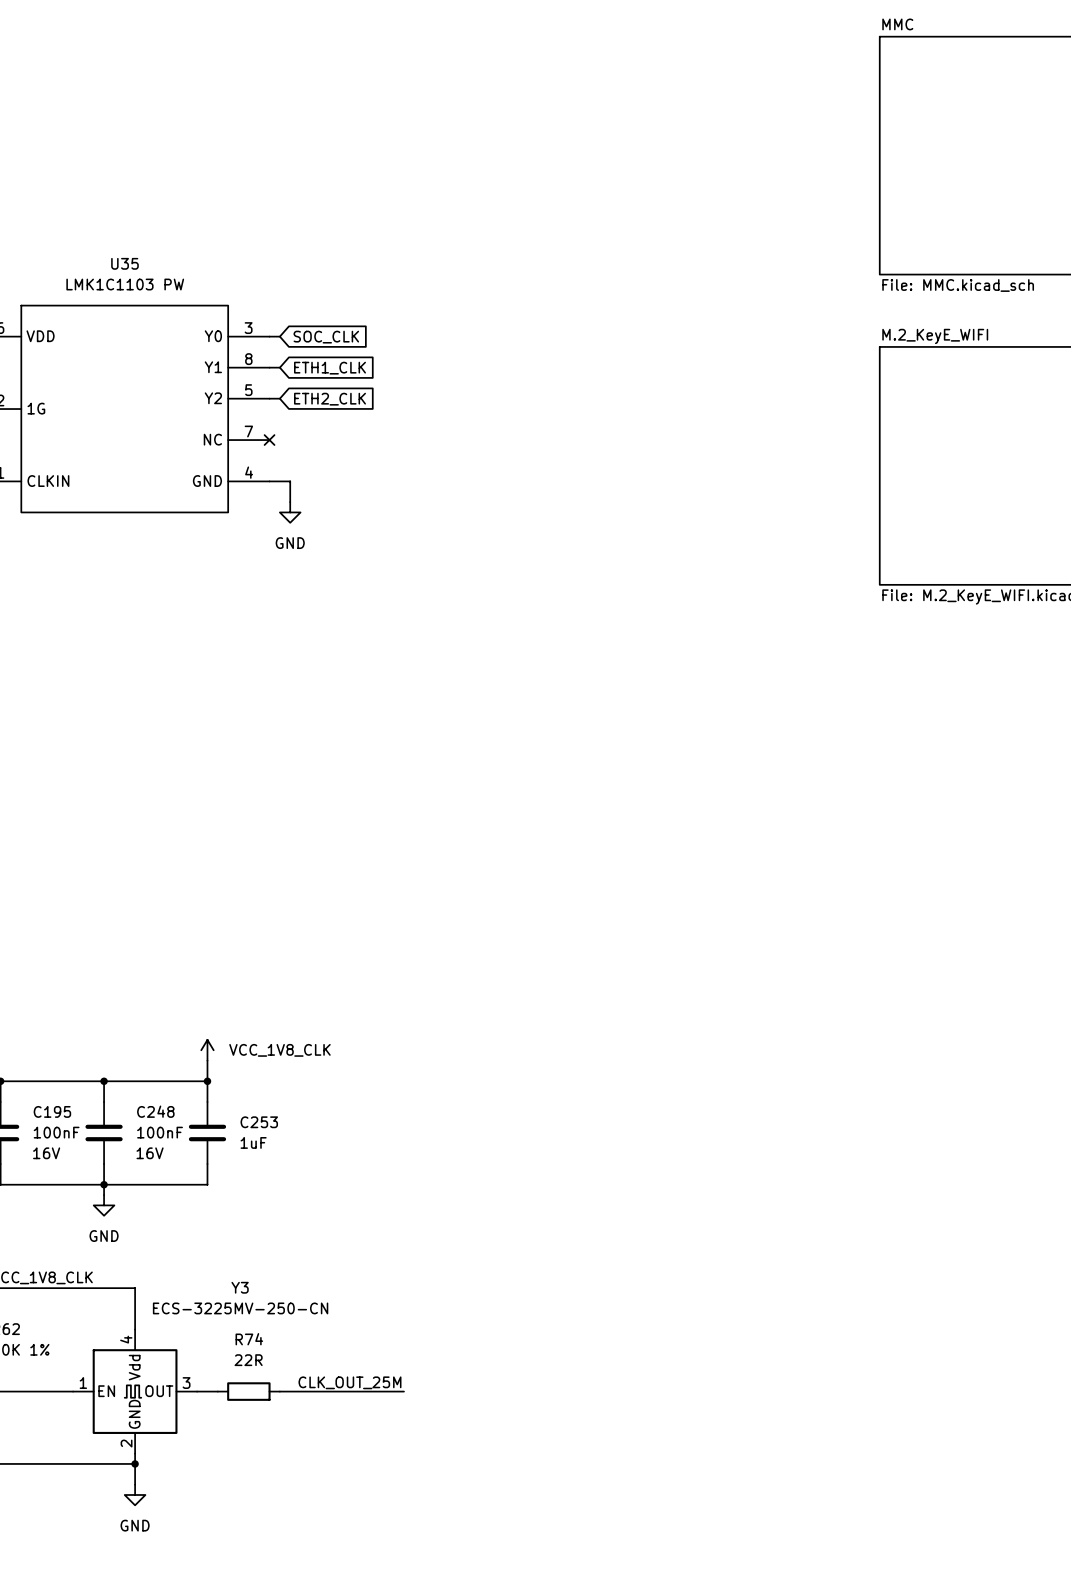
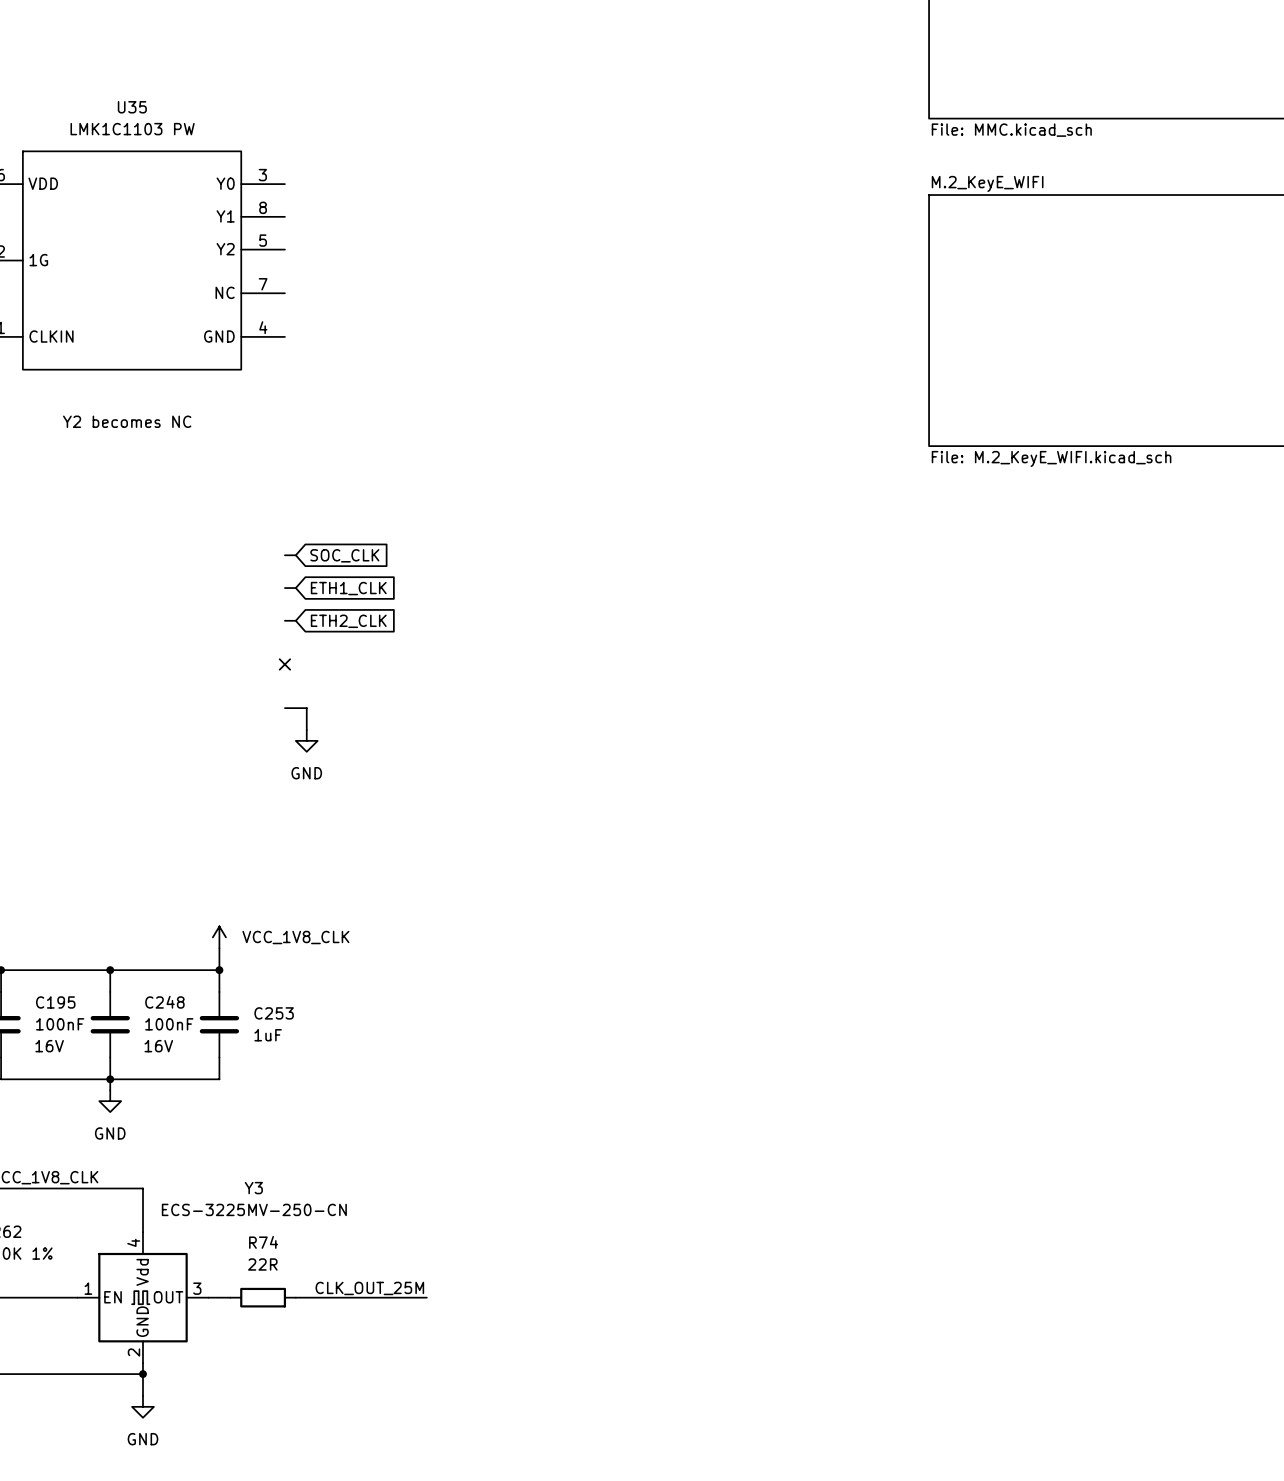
wire: (269, 336) (279, 336) -> none
global label: SOC_CLK (326, 337) -> none
wire: (269, 367) (279, 367) -> none
global label: ETH1_CLK (330, 368) -> none
wire: (269, 398) (279, 398) -> none
global label: ETH2_CLK (330, 399) -> none
no-connect mark: (269, 440) -> none
wire: (269, 481) (290, 481) (290, 502) -> none
power symbol: GND (290, 512) -> none
text: none -> Y2 becomes NC (127, 421)
wire: none -> (284, 555) (295, 555)
global label: none -> SOC_CLK (344, 555)
wire: none -> (284, 588) (295, 588)
global label: none -> ETH1_CLK (348, 588)
wire: none -> (284, 620) (295, 620)
global label: none -> ETH2_CLK (348, 621)
no-connect mark: none -> (284, 664)
wire: none -> (284, 708) (306, 708) (306, 729)
power symbol: none -> GND (306, 740)

